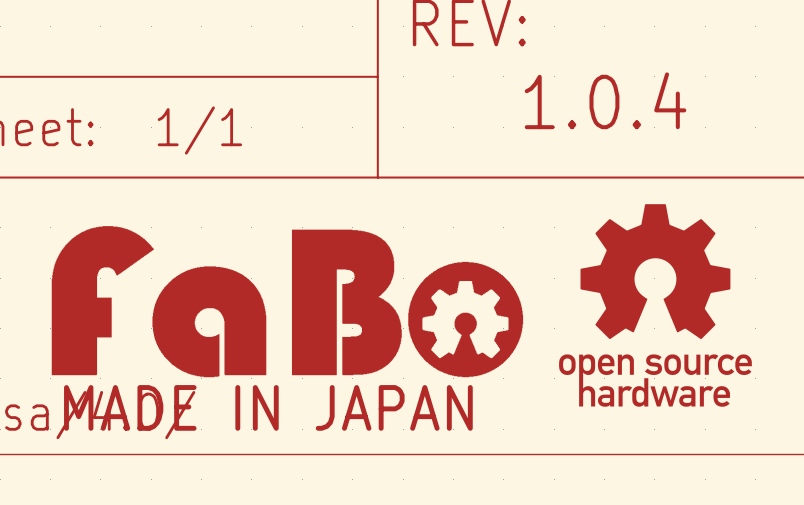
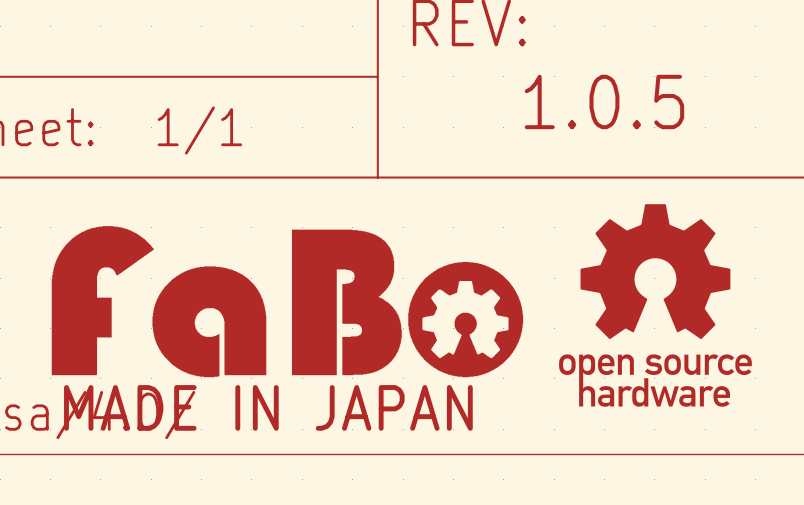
text: 1.0.4 (605, 100) -> 1.0.5 (604, 101)

